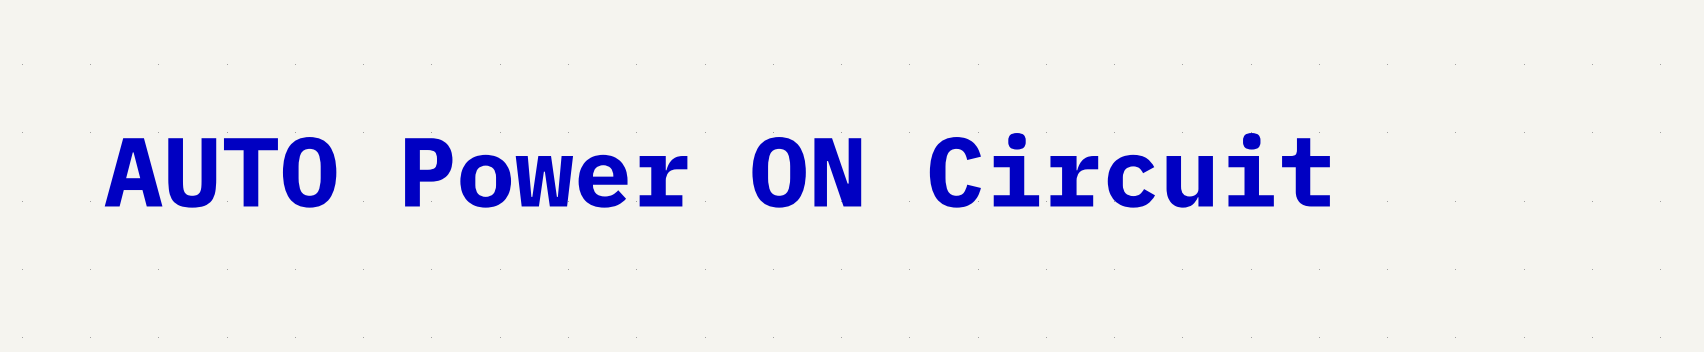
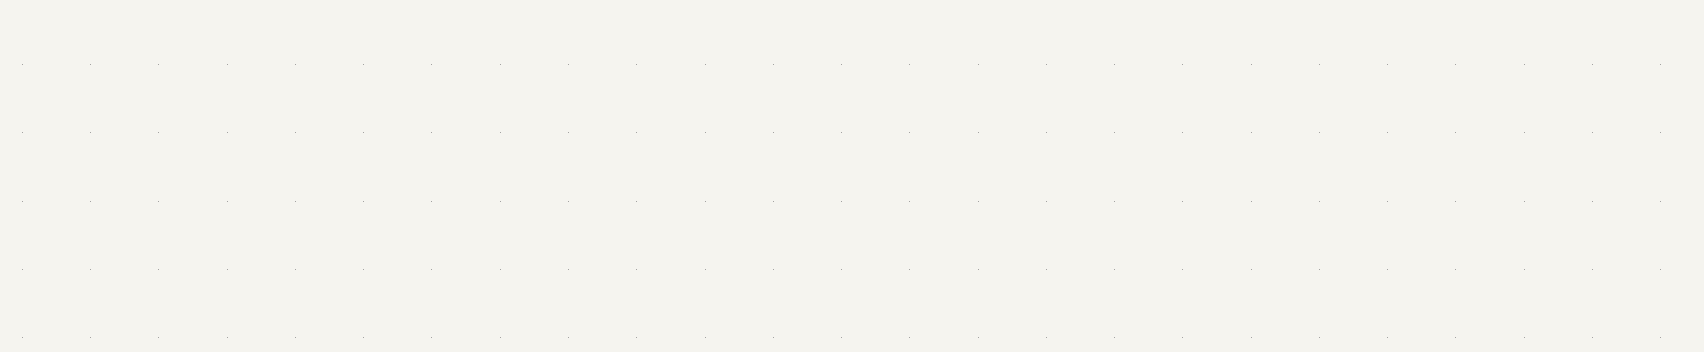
text: AUTO Power ON Circuit (717, 170) -> none

